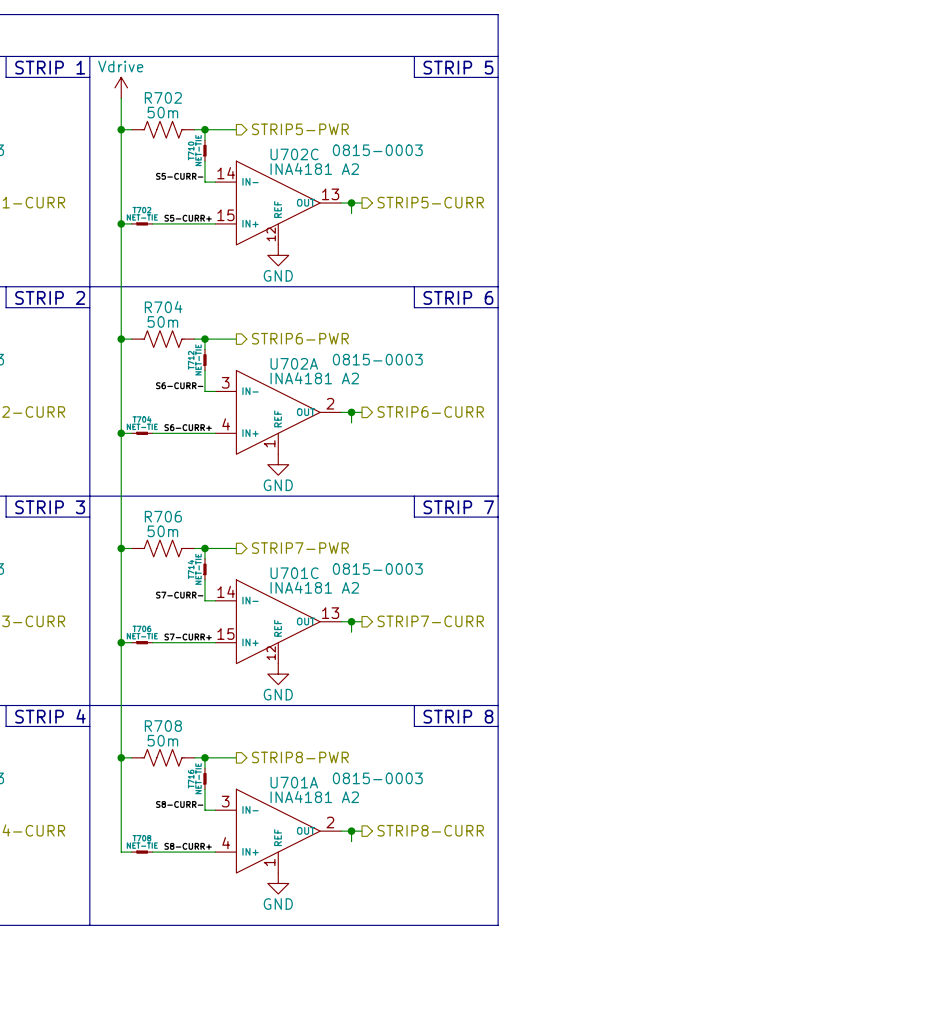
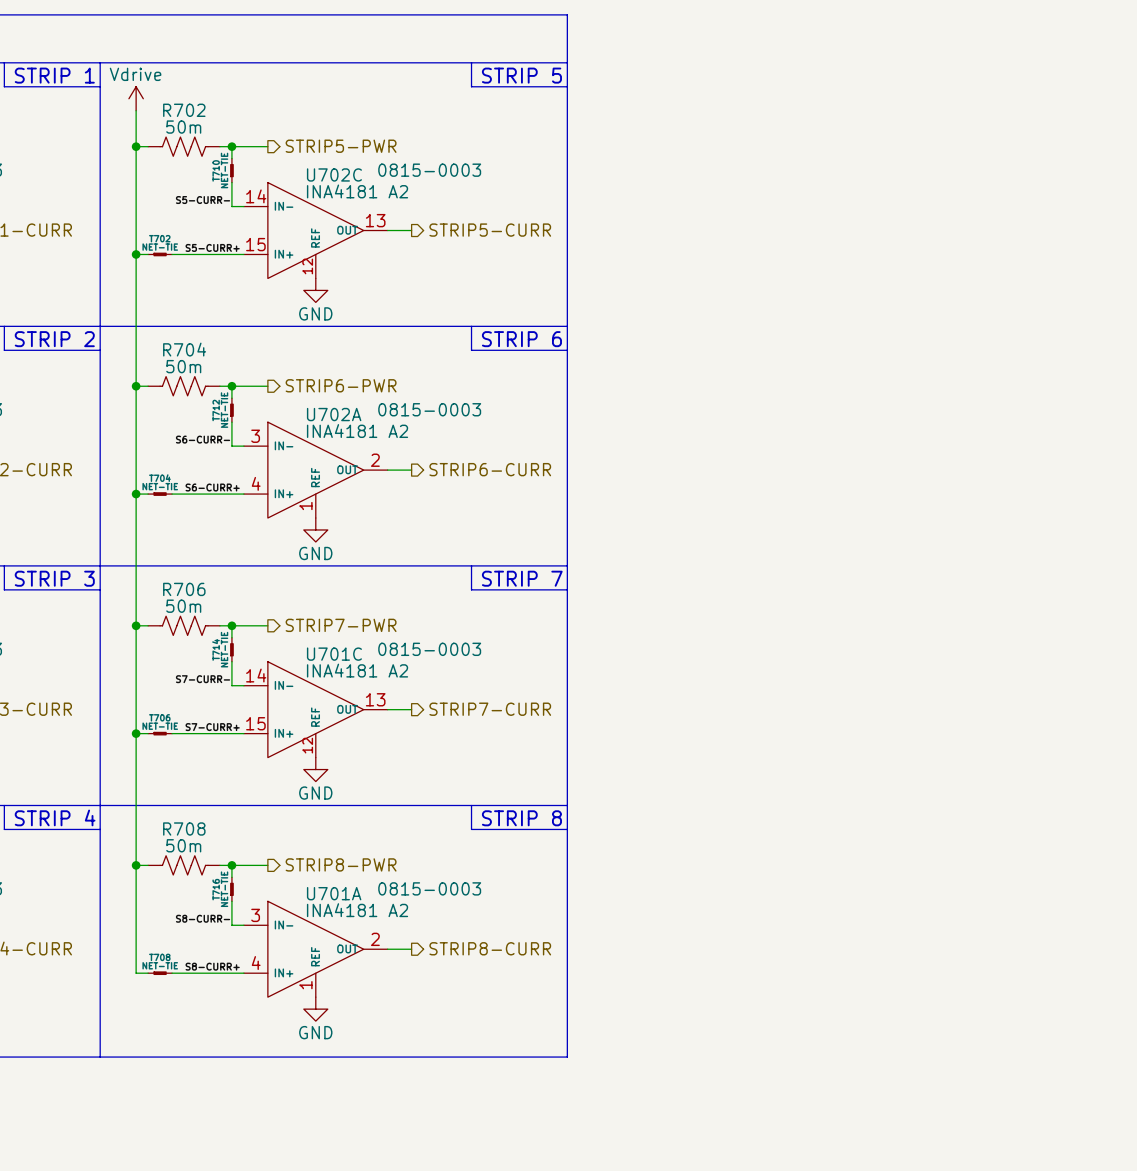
wire: (351, 203) (351, 213) -> none
junction: (351, 203) -> none
wire: (351, 412) (351, 422) -> none
junction: (351, 412) -> none
wire: (351, 621) (351, 632) -> none
junction: (351, 621) -> none
wire: (351, 831) (351, 841) -> none
junction: (351, 831) -> none

